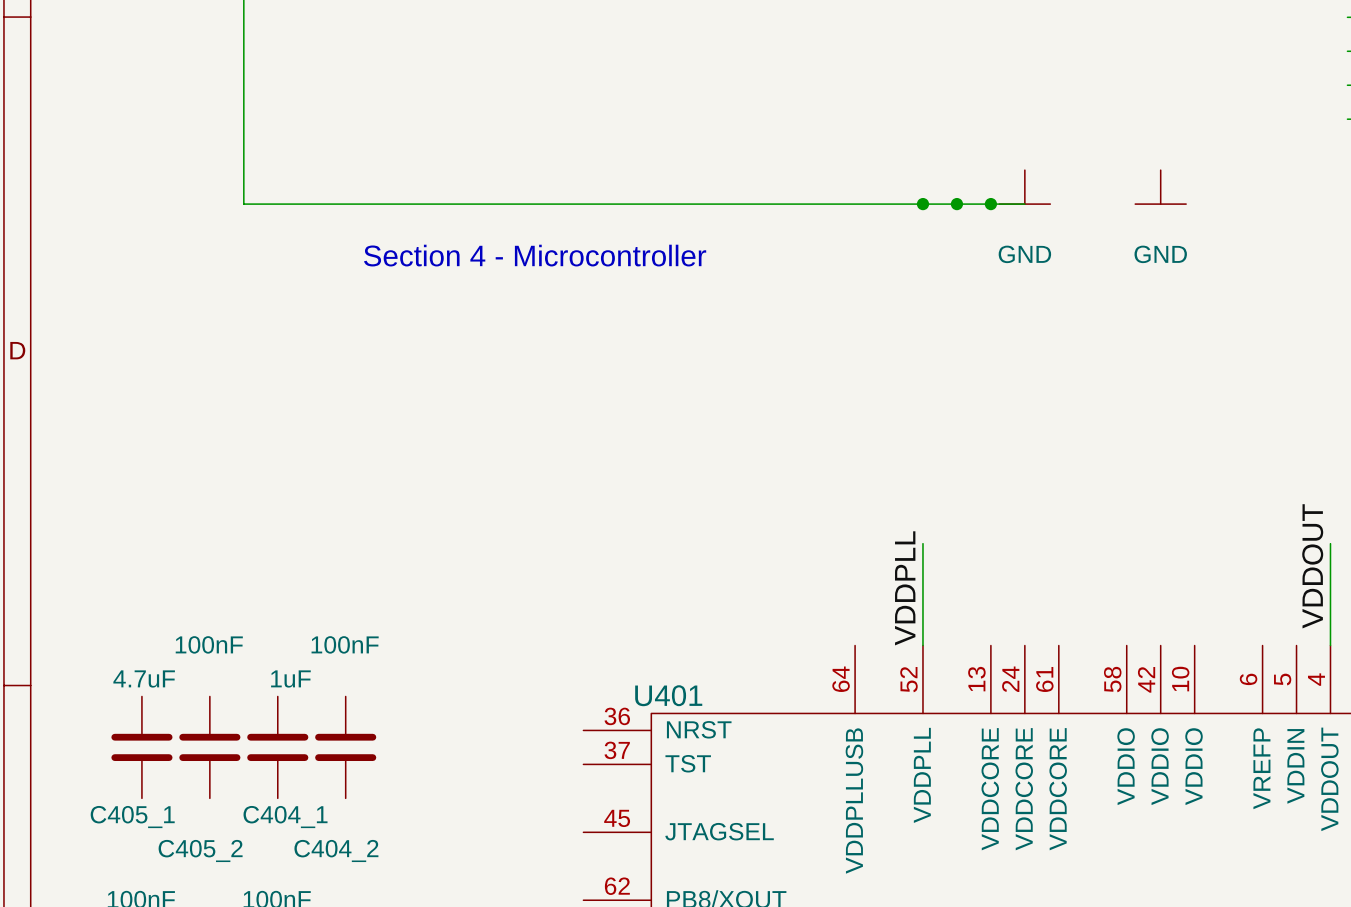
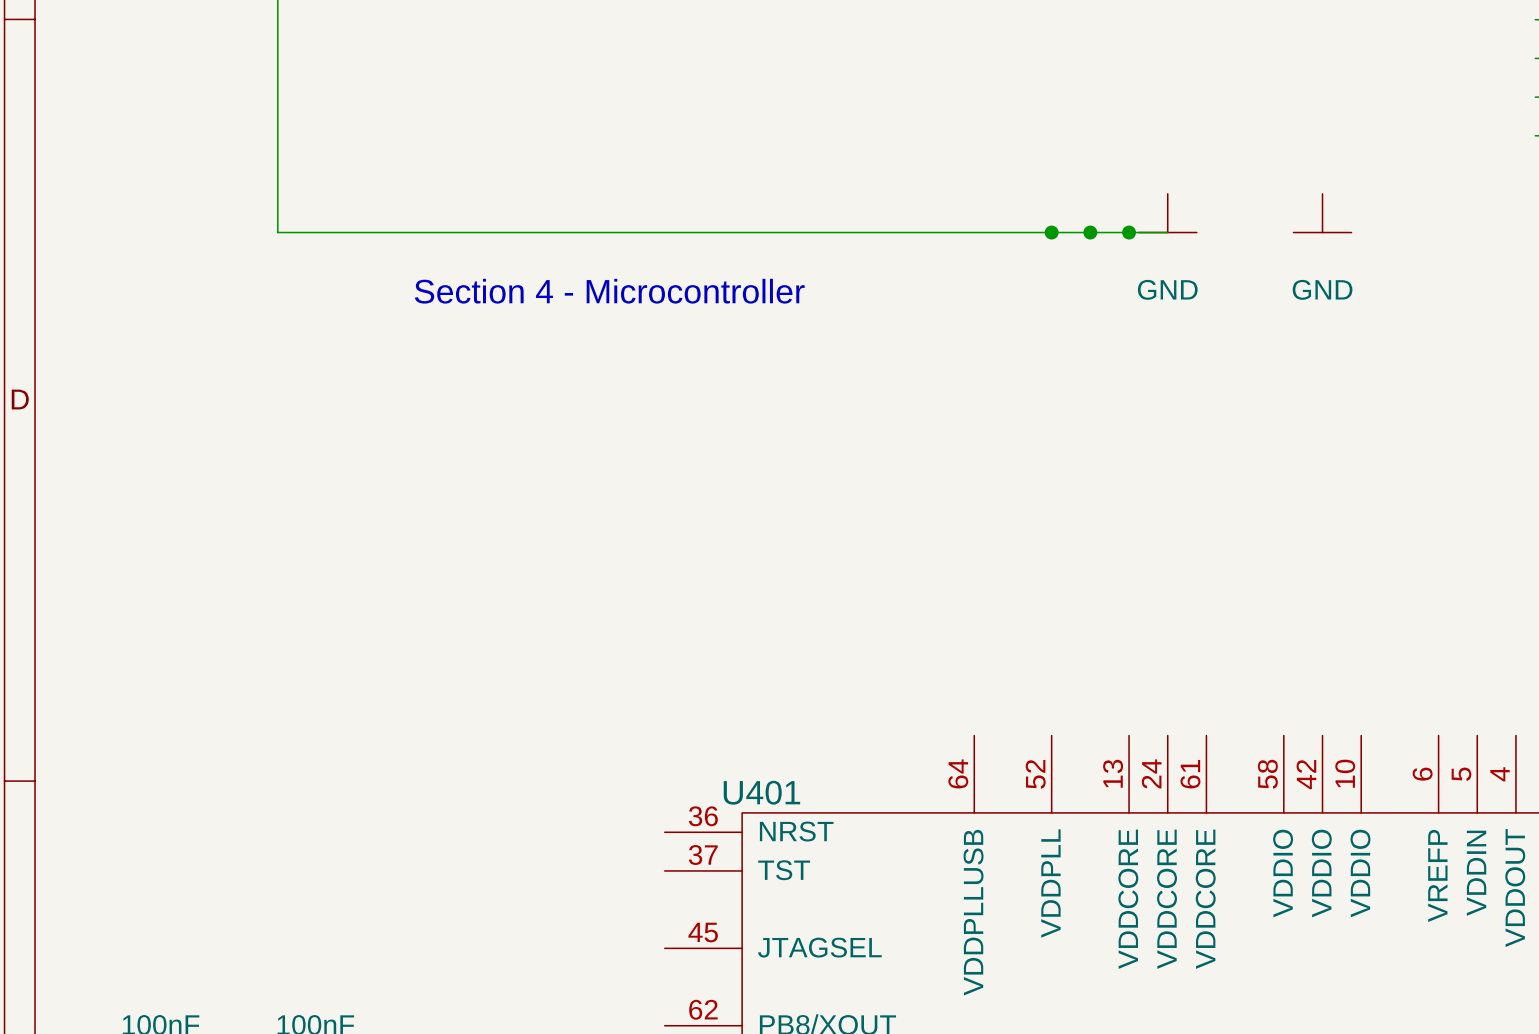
wire: (922, 543) (922, 645) -> none
wire: (1330, 543) (1330, 645) -> none
label: VDDOUT (1312, 566) -> none
label: VDDPLL (905, 588) -> none
C405_1: 4.7uF (141, 747) -> none
C405_2: 100nF (209, 747) -> none
C404_1: 1uF (277, 747) -> none
C404_2: 100nF (345, 747) -> none

